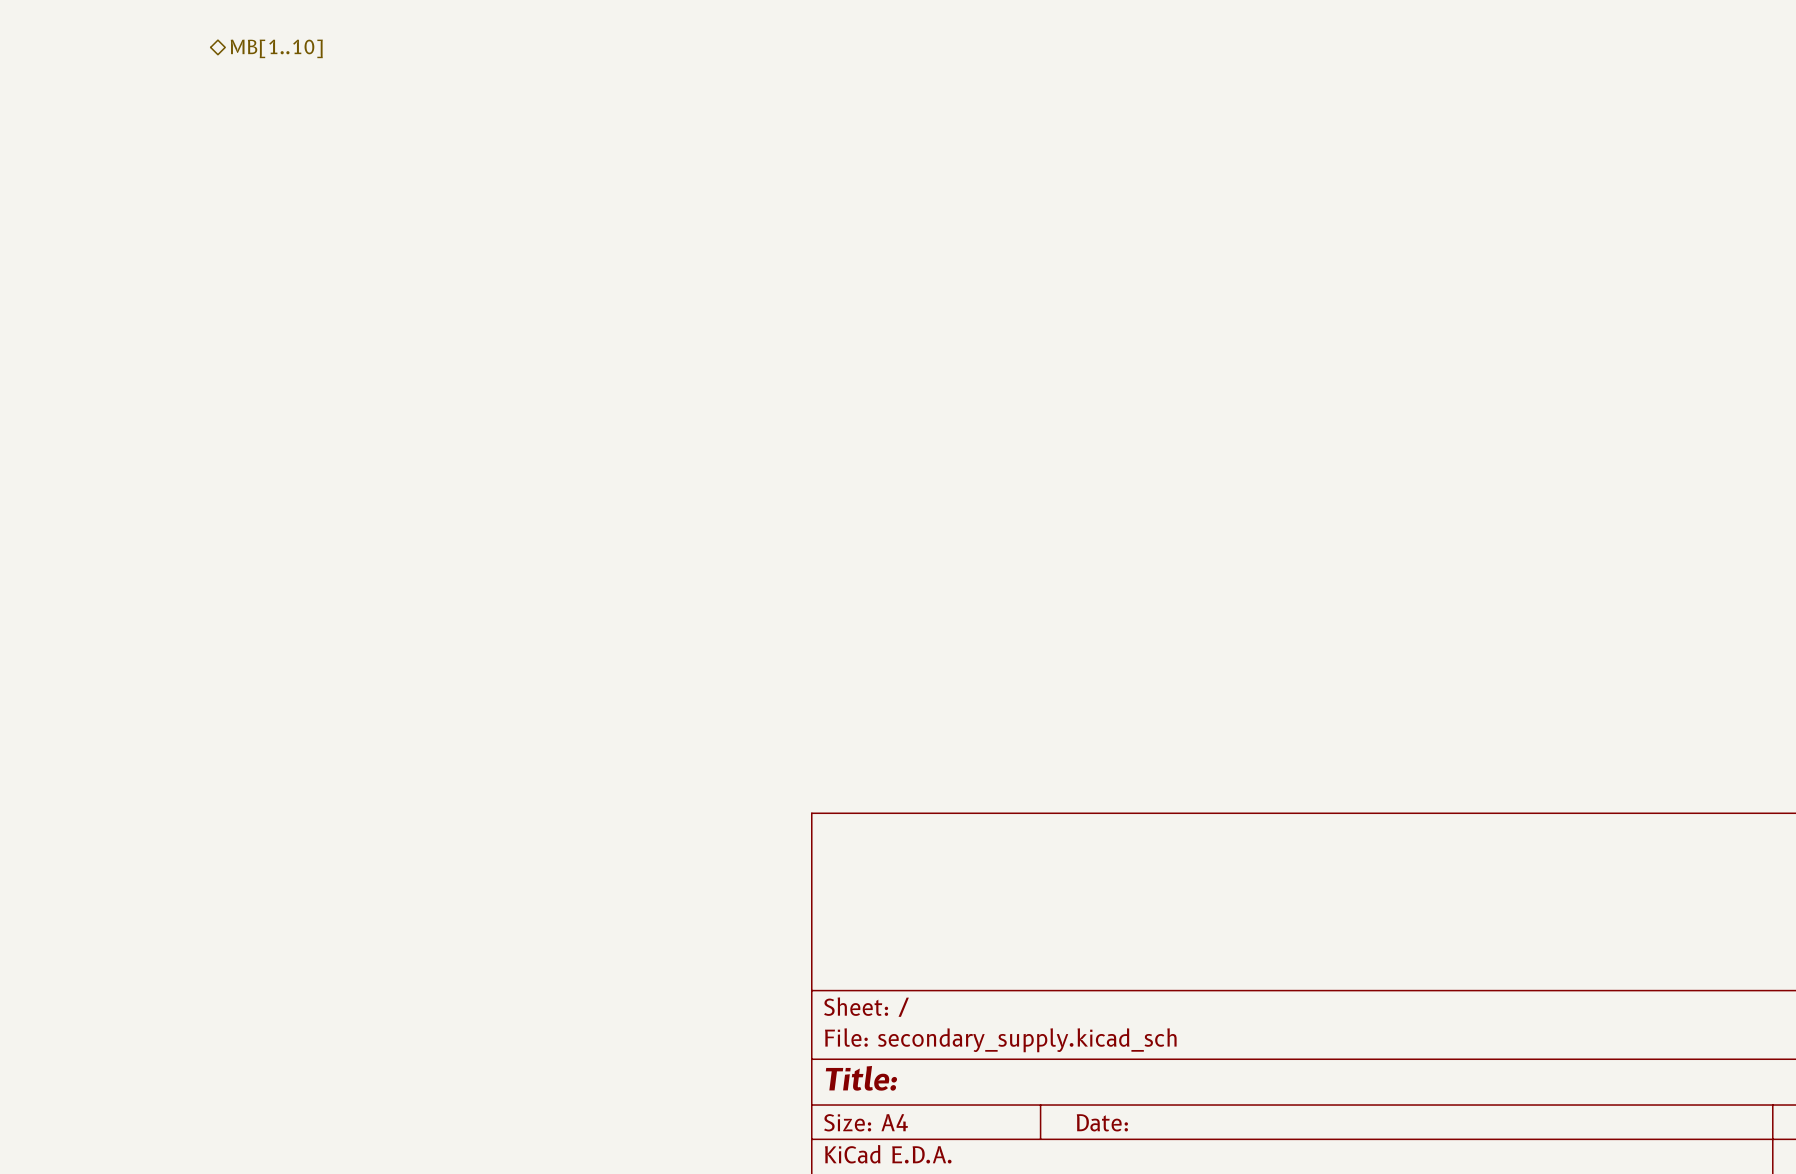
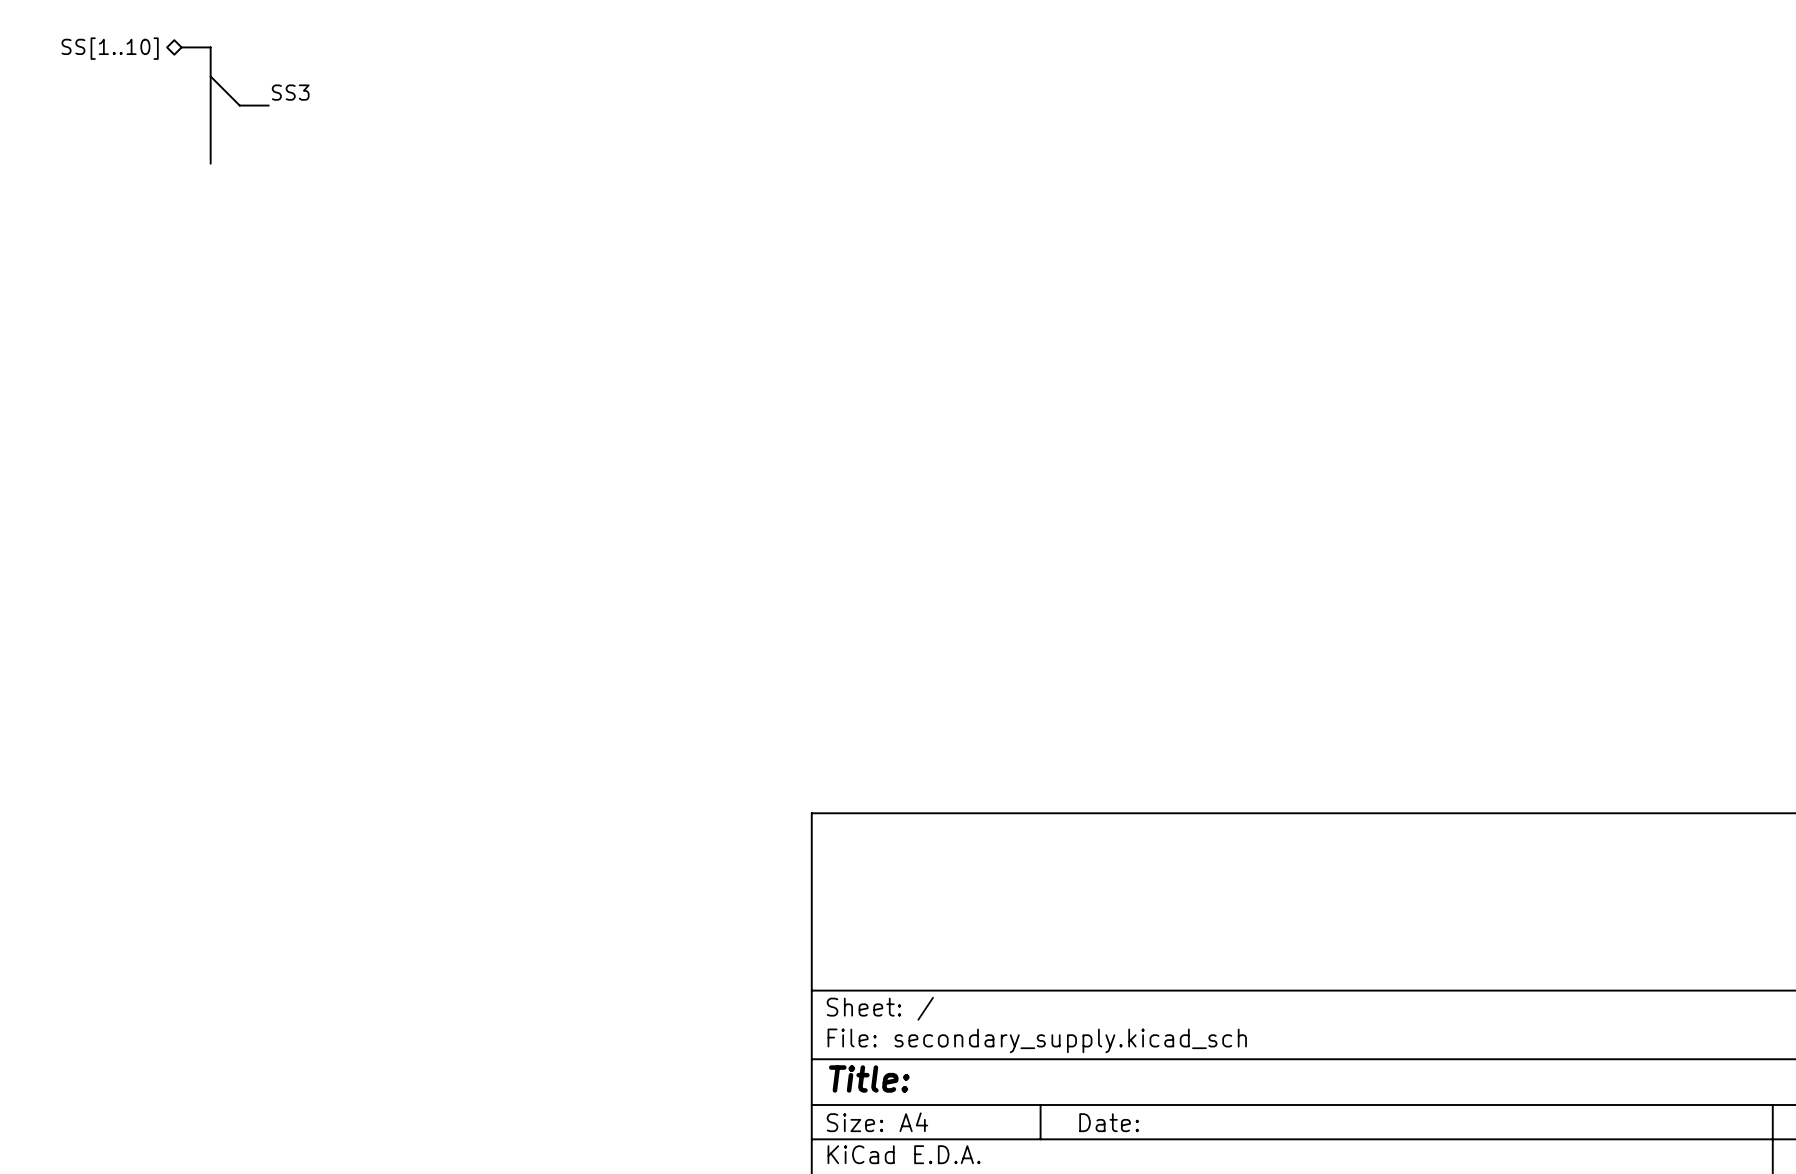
bus: none -> (181, 47) (210, 47) (210, 163)
hierarchical label: none -> SS[1..10] (110, 48)
hierarchical label: MB[1..10] (276, 48) -> none
wire: none -> (210, 76) (239, 105) (268, 105)
label: none -> SS3 (290, 92)

